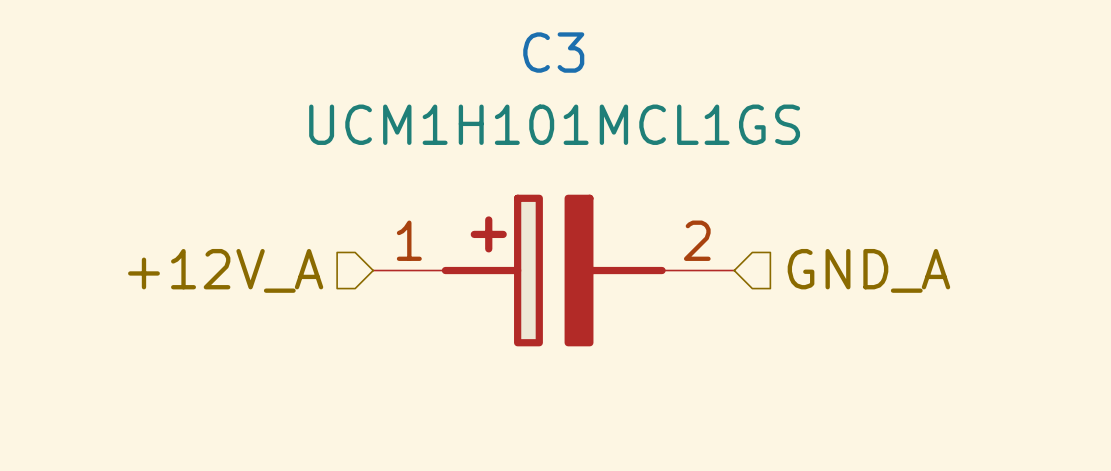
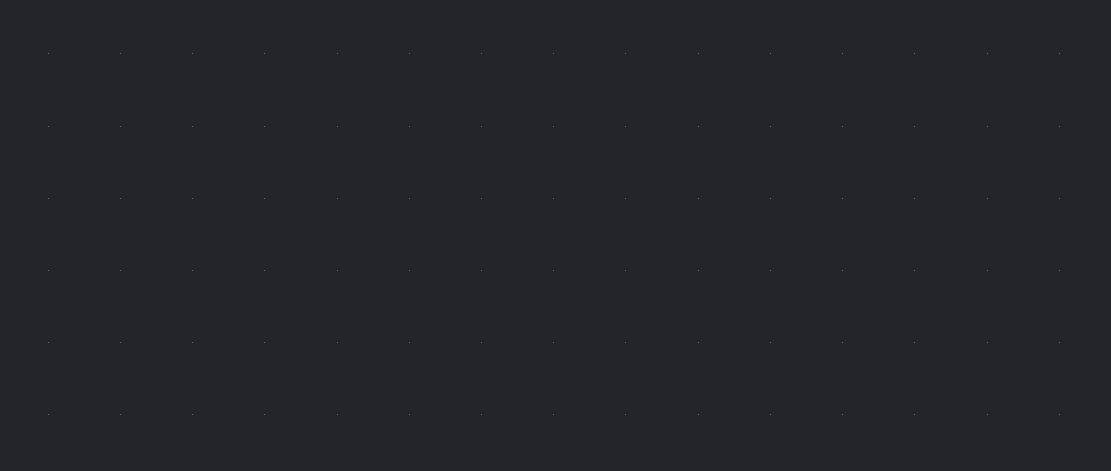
hierarchical label: +12V_A (225, 270) -> none
C3: UCM1H101MCL1GS (553, 270) -> none
hierarchical label: GND_A (868, 270) -> none

